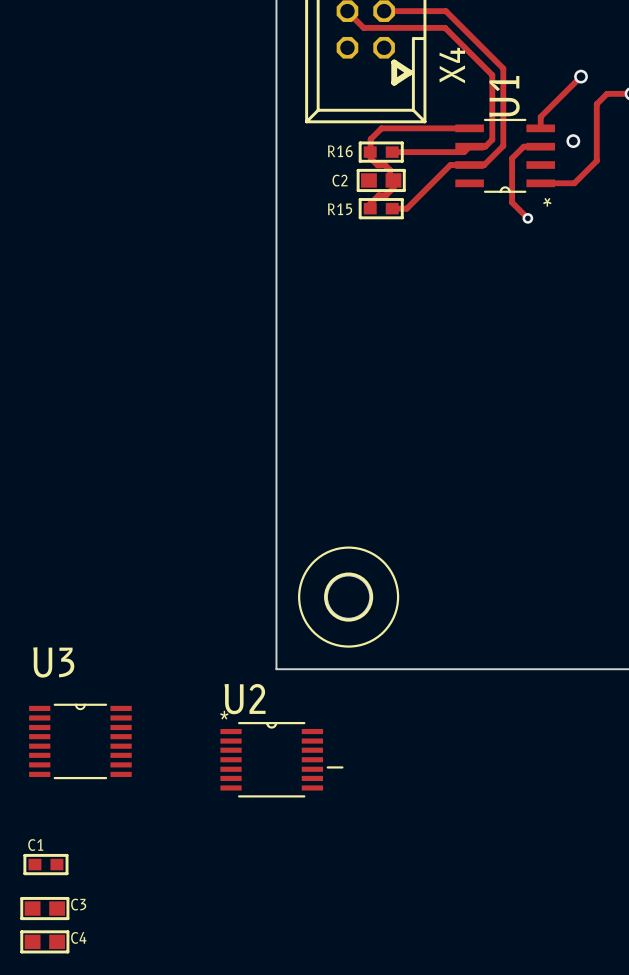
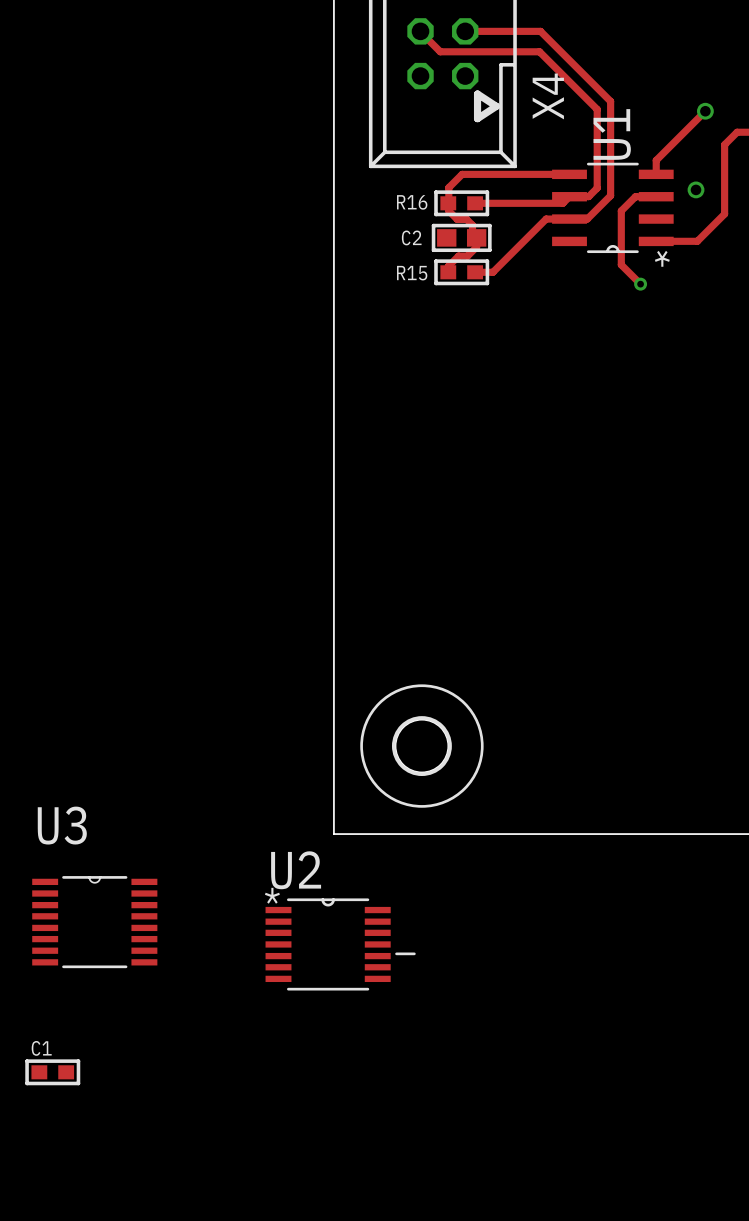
C3: (44, 908) -> none
C4: (44, 941) -> none

